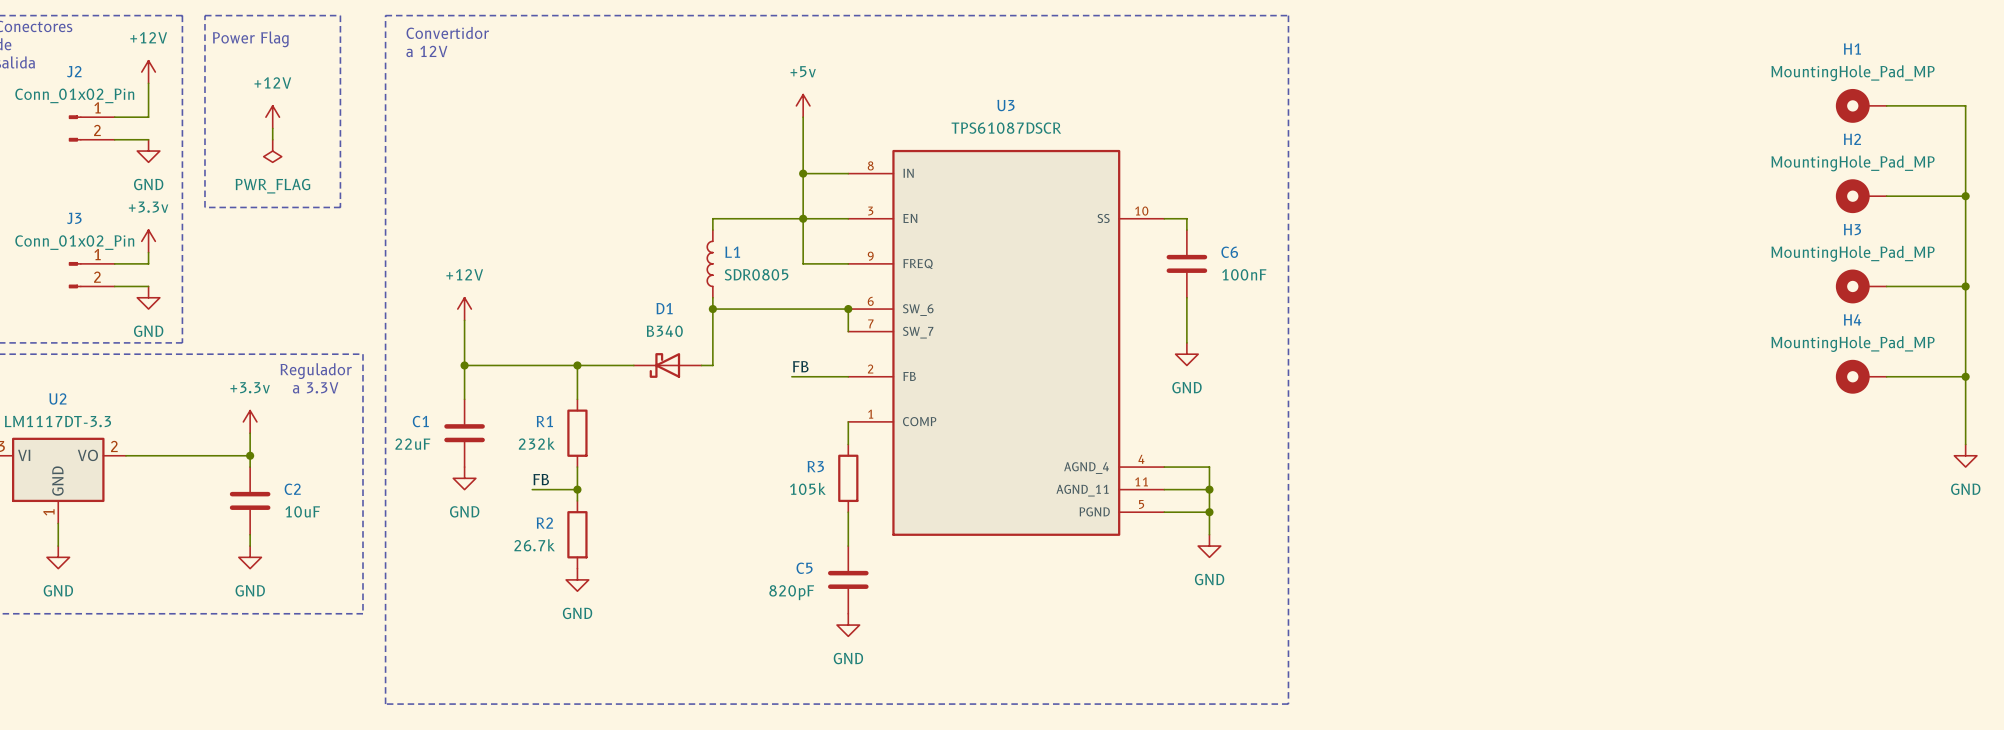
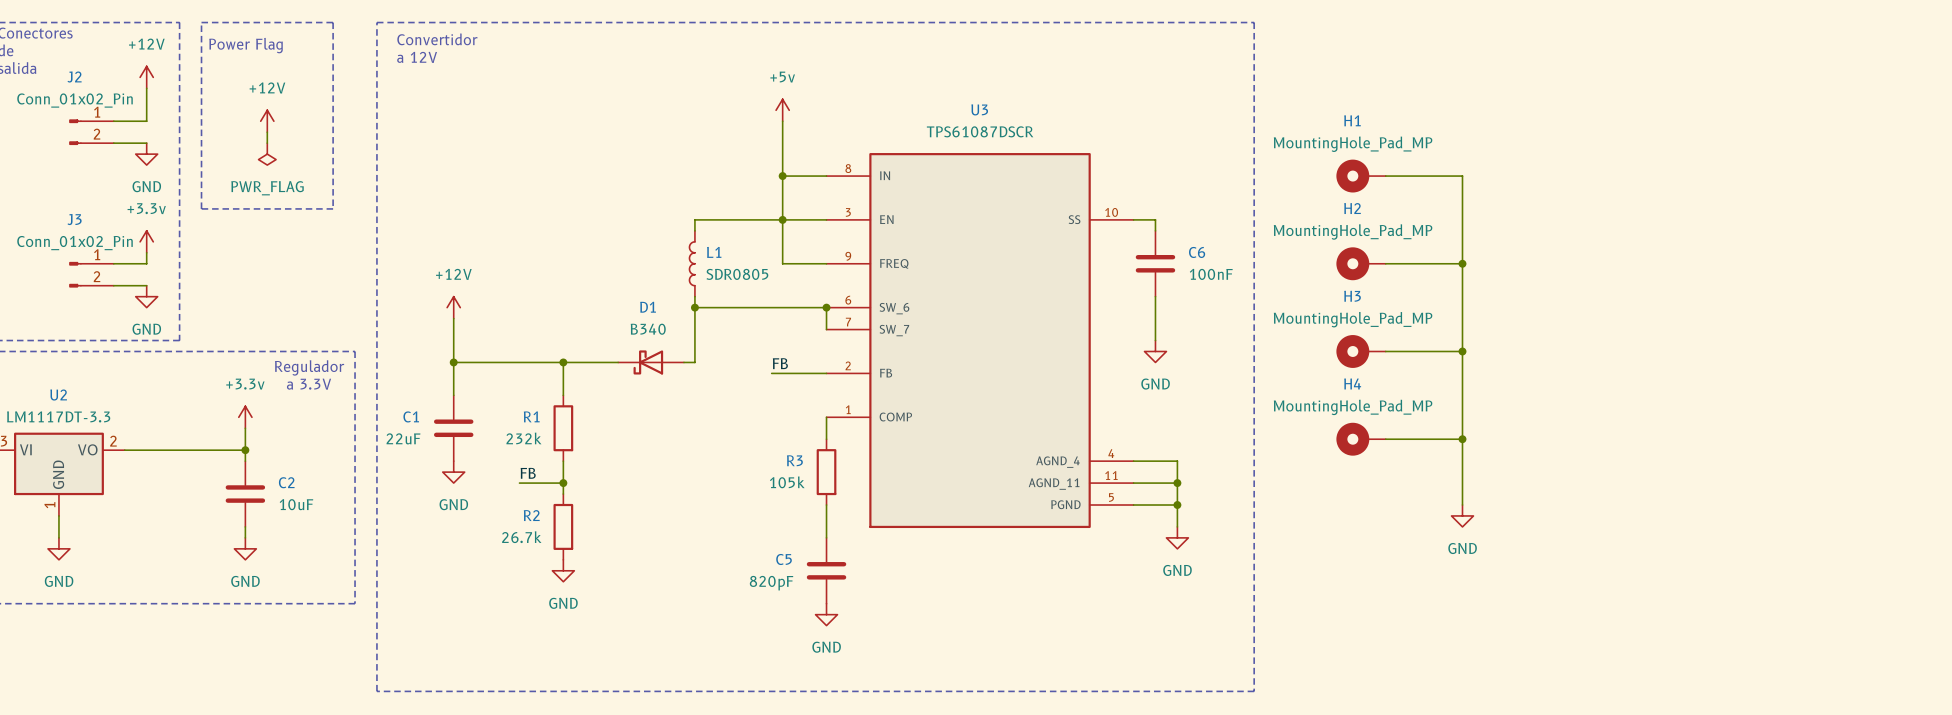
H1 position: (1861, 105) -> (1361, 176)
wire: (1886, 105) (1965, 105) (1965, 444) -> none
wire: none -> (1385, 176) (1462, 176) (1462, 505)
H2 position: (1861, 196) -> (1361, 263)
wire: (1886, 196) (1965, 196) -> none
junction: (1965, 196) -> none
wire: none -> (1385, 263) (1462, 263)
junction: none -> (1462, 263)
H3 position: (1861, 286) -> (1361, 351)
wire: (1886, 286) (1965, 286) -> none
junction: (1965, 286) -> none
wire: none -> (1385, 351) (1462, 351)
junction: none -> (1462, 351)
H4 position: (1861, 376) -> (1361, 439)
wire: (1886, 376) (1965, 376) -> none
junction: (1965, 376) -> none
wire: none -> (1385, 439) (1462, 439)
junction: none -> (1462, 439)
power symbol: GND (1965, 455) -> none
power symbol: none -> GND (1462, 515)

